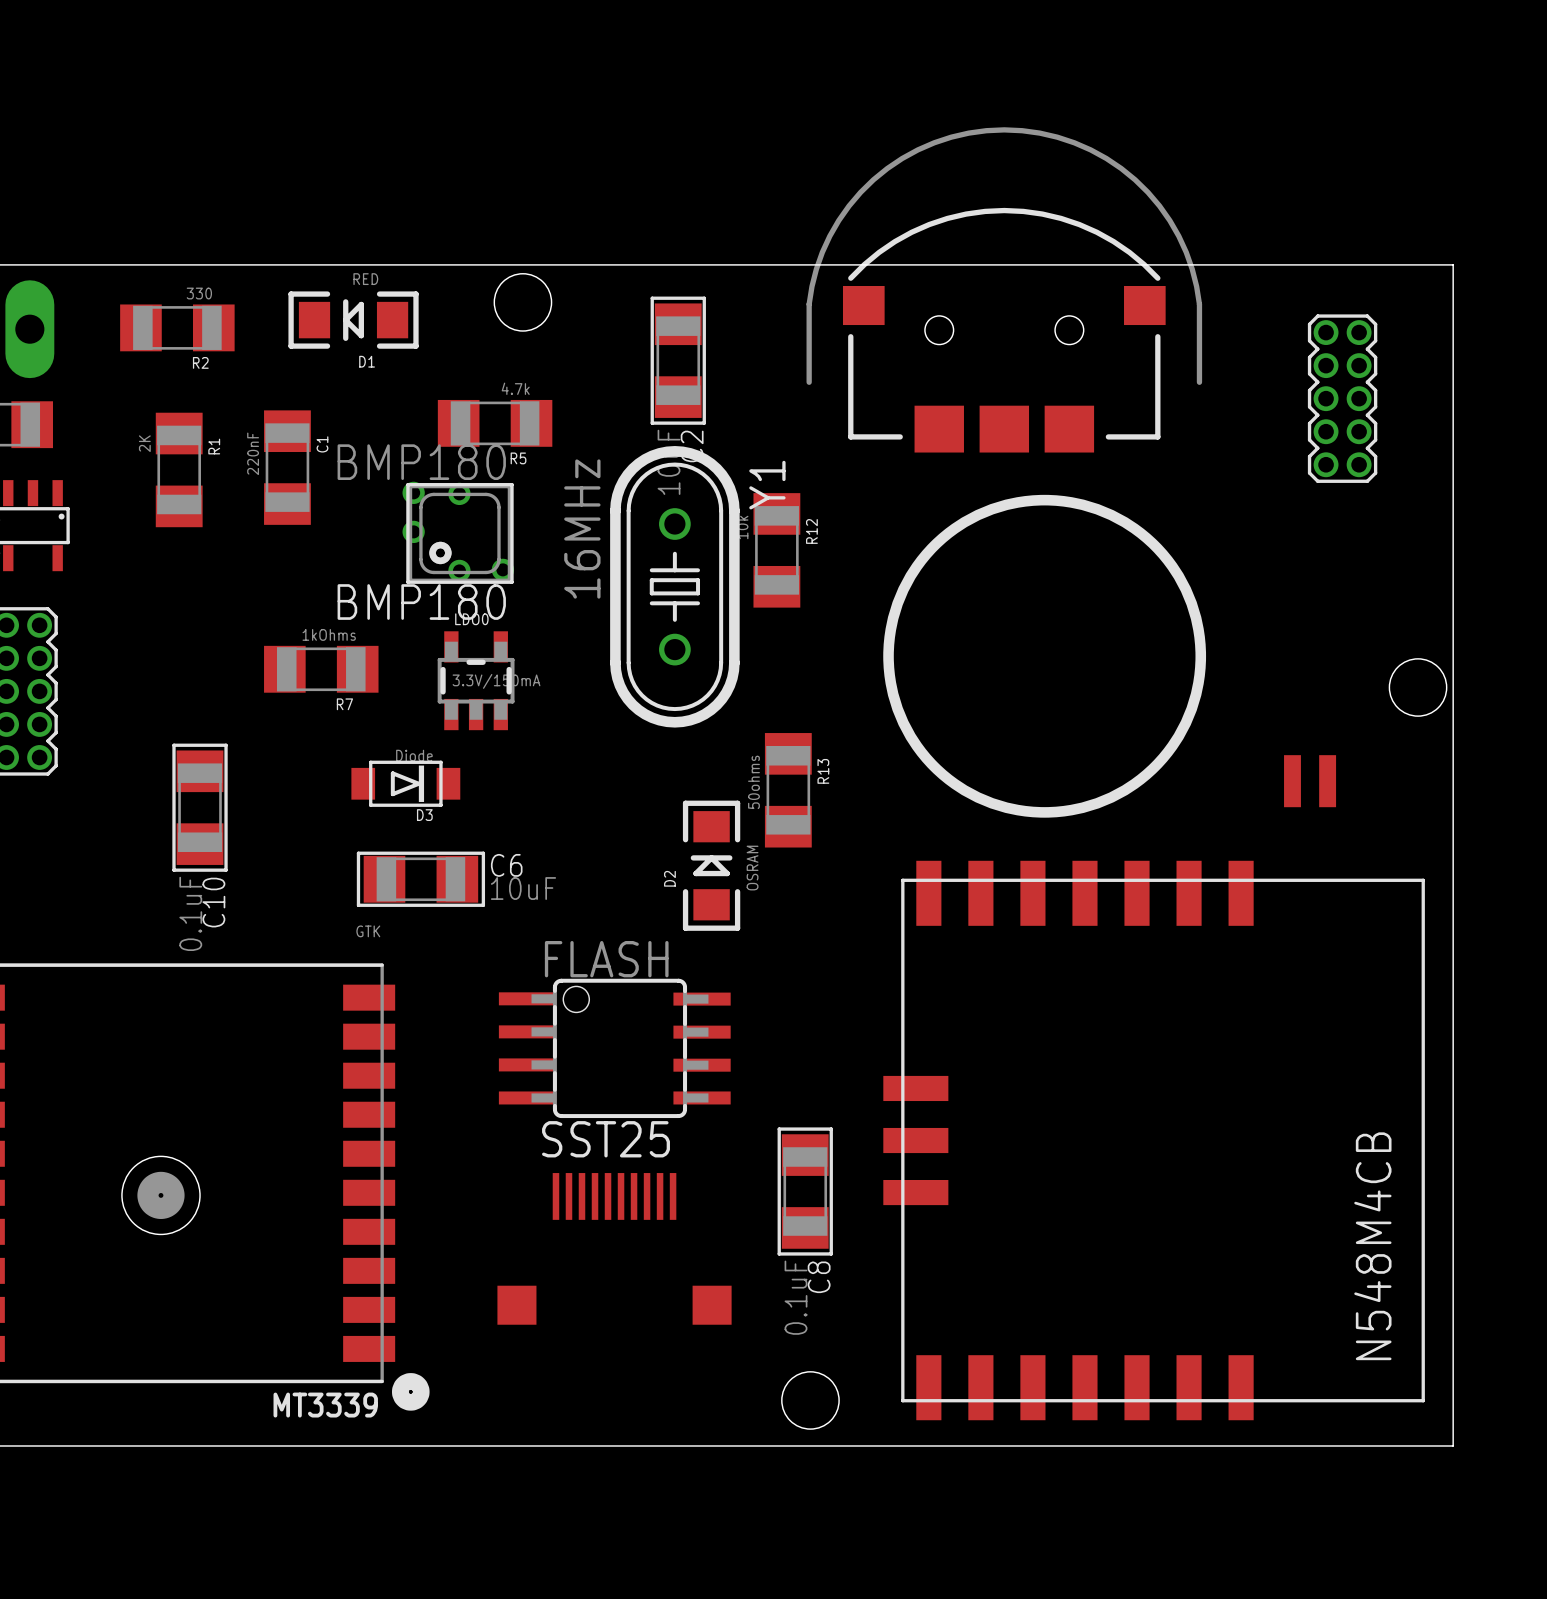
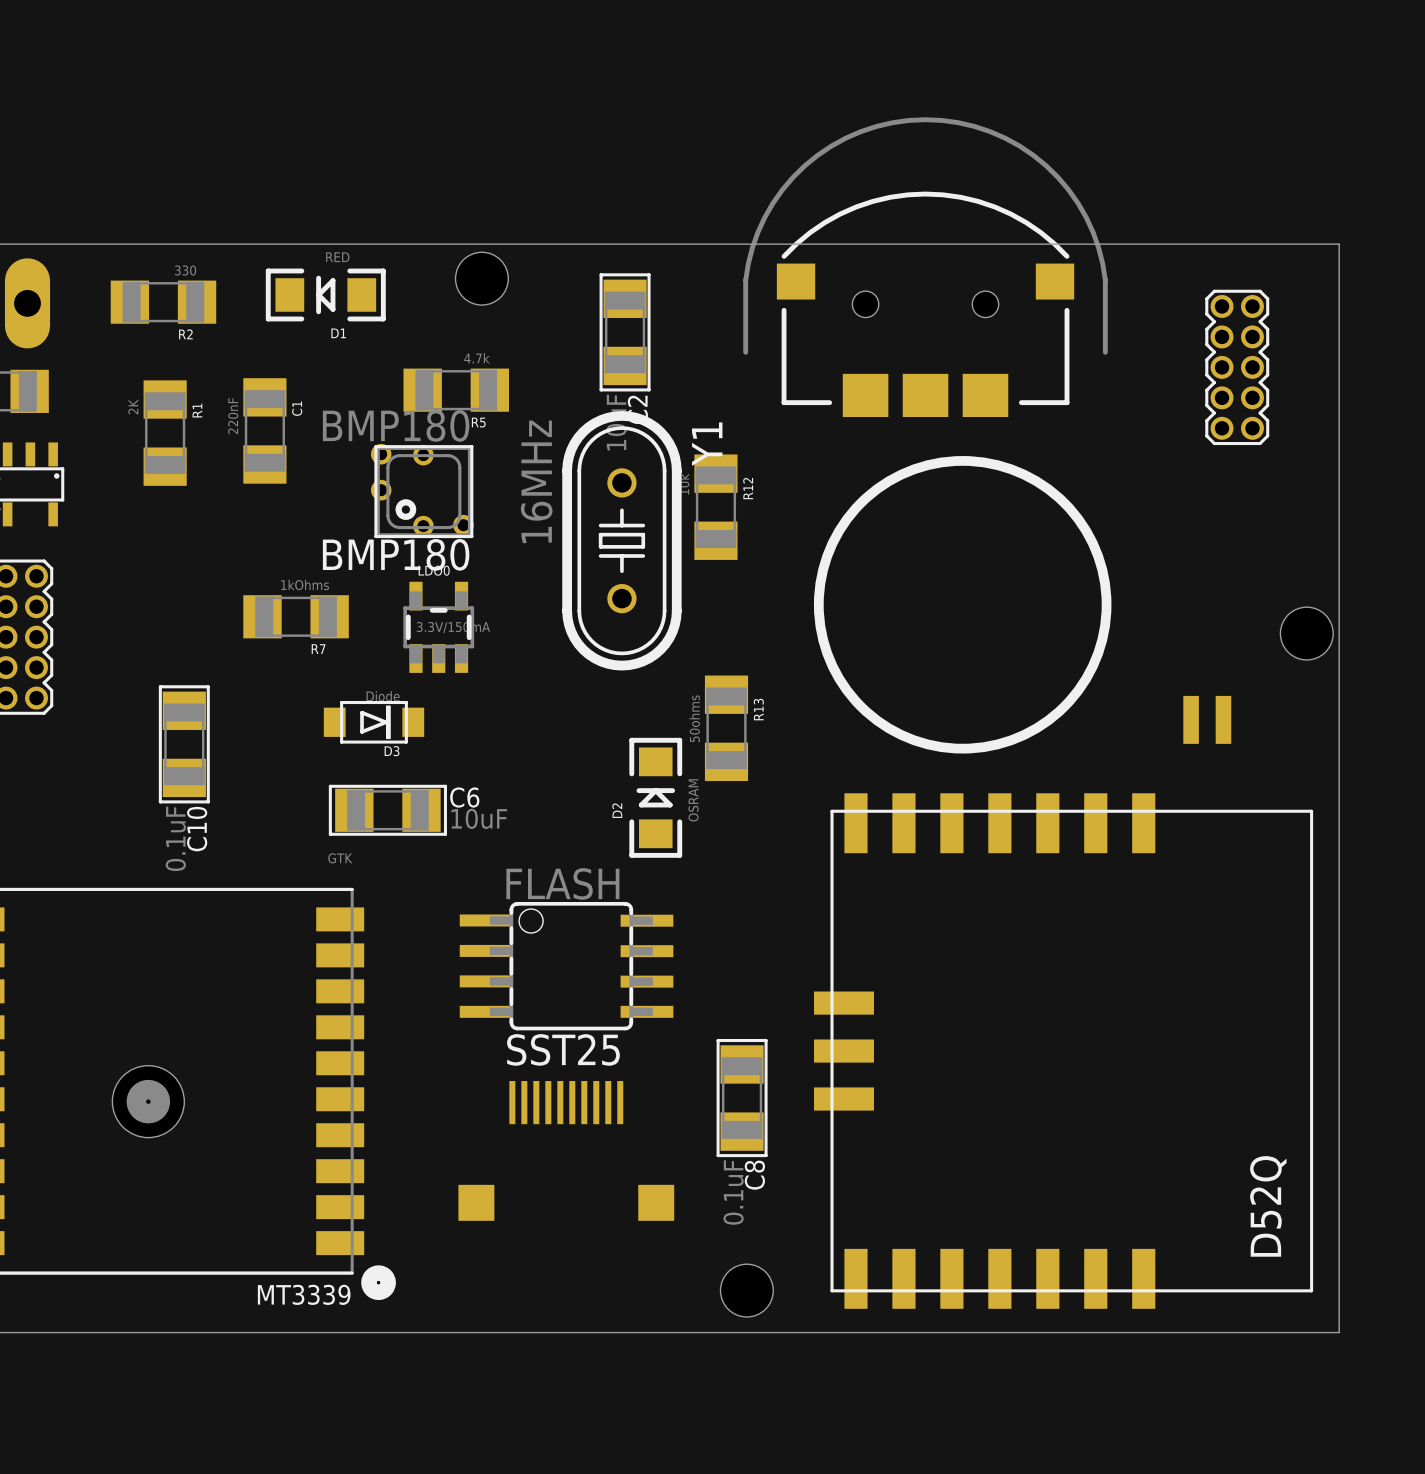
part text: N548M4CB (1372, 1246) -> D52Q (1268, 1206)

